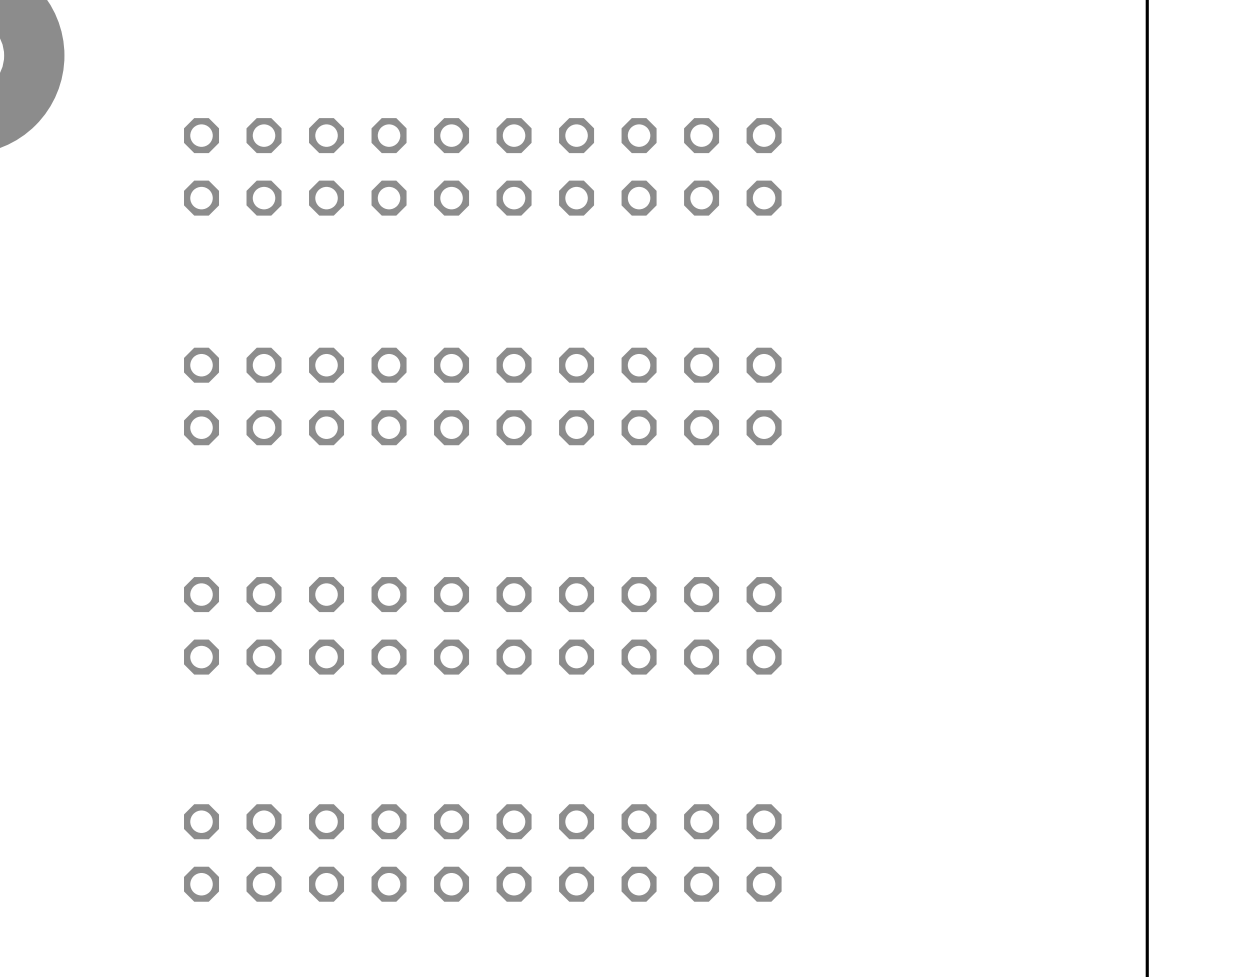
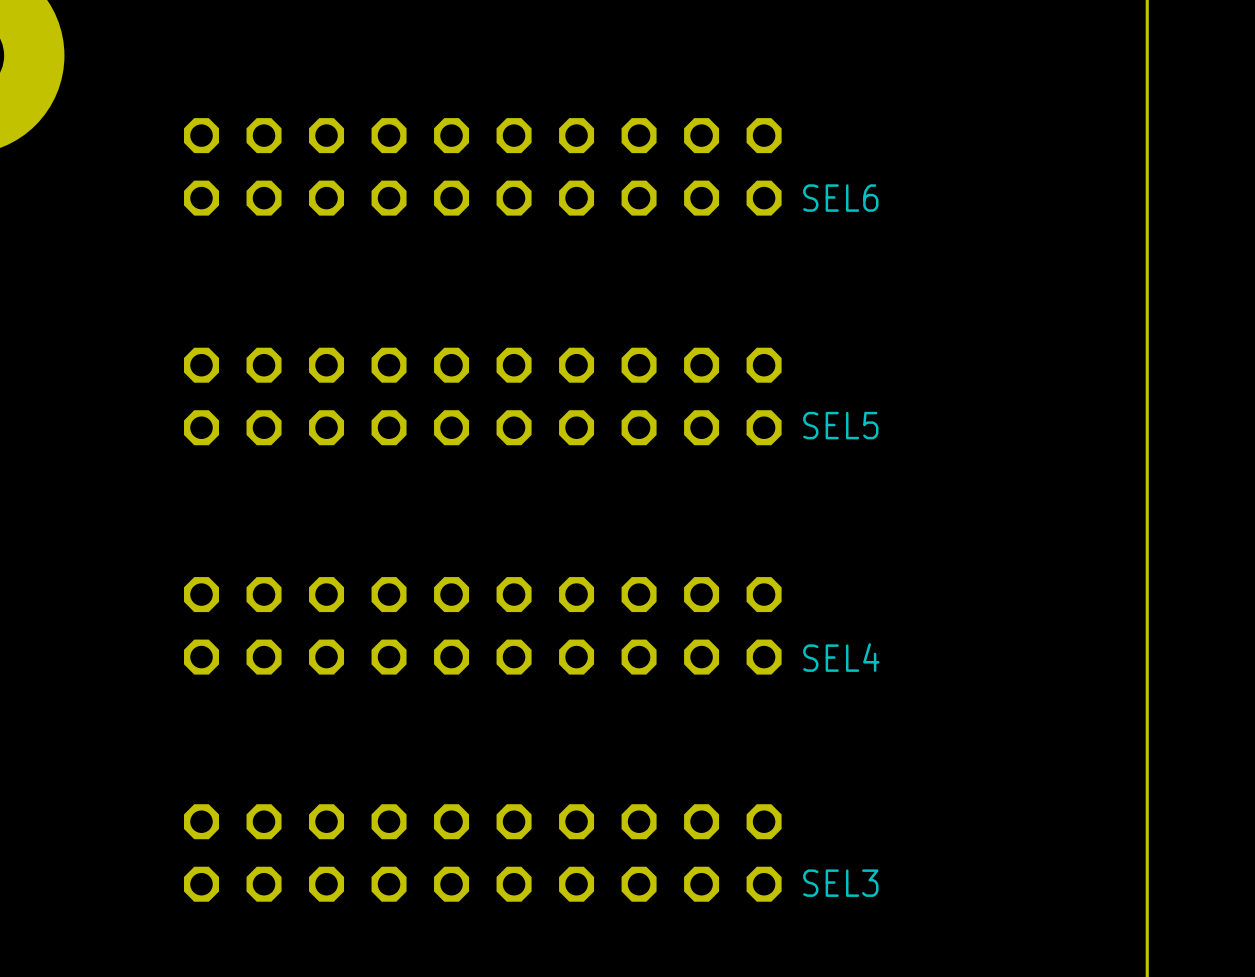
text: none -> SEL6 (840, 198)
text: none -> SEL5 (840, 425)
text: none -> SEL4 (841, 657)
text: none -> SEL3 (840, 883)

